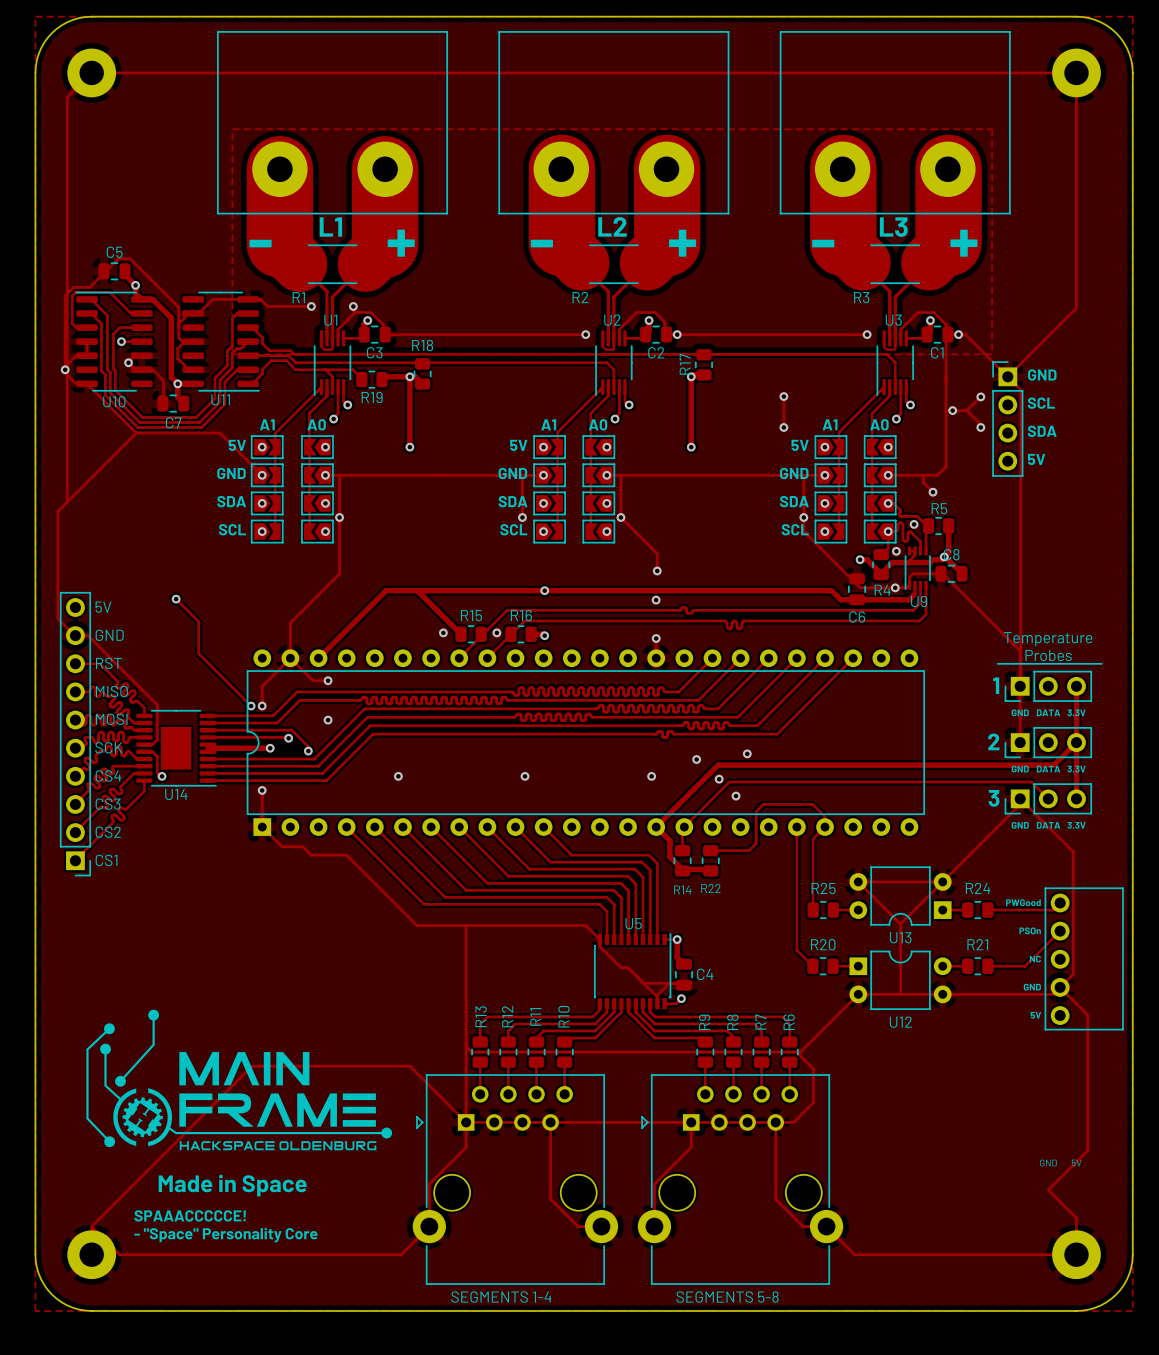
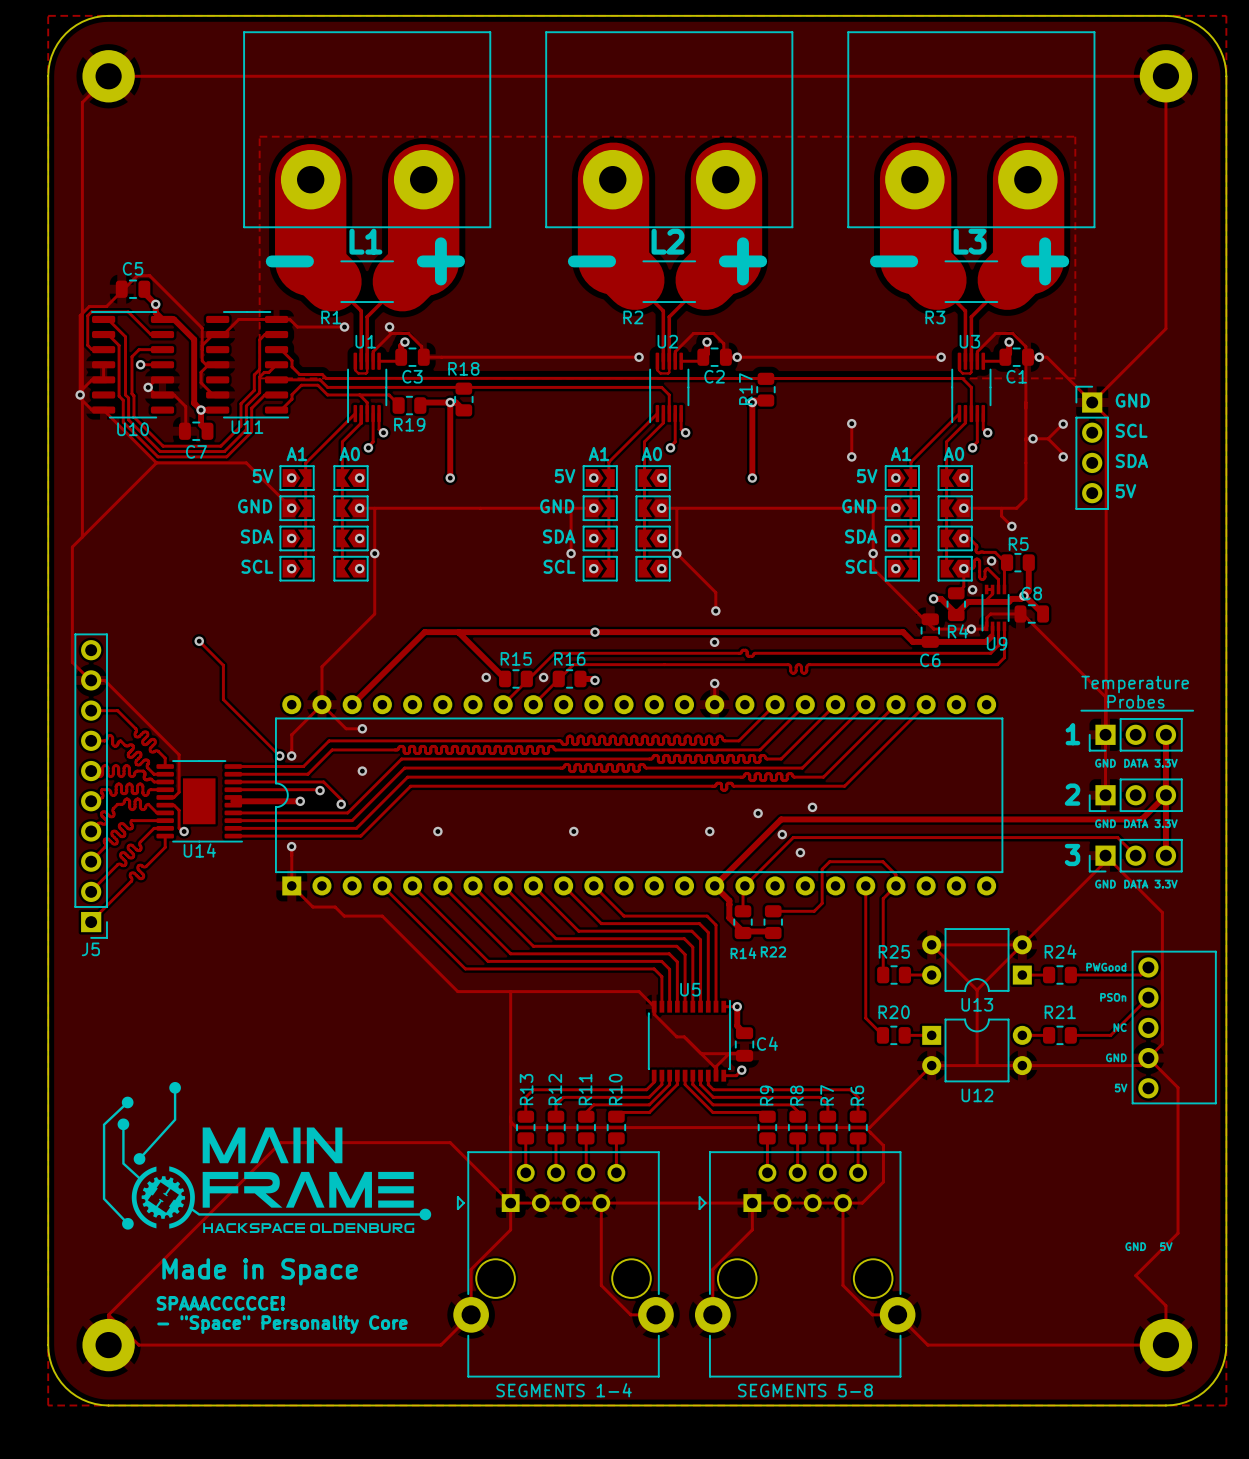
text: 5V (103, 607) -> none
text: GND (109, 635) -> none
text: RST (108, 663) -> none
text: MISO (111, 691) -> none
text: MOSI (111, 719) -> none
text: SCK (108, 747) -> none
text: CS4 (108, 775) -> none
text: CS3 (108, 804) -> none
text: CS2 (108, 832) -> none
text: CS1 (106, 860) -> none
J5 name: none -> J5 (90, 949)

